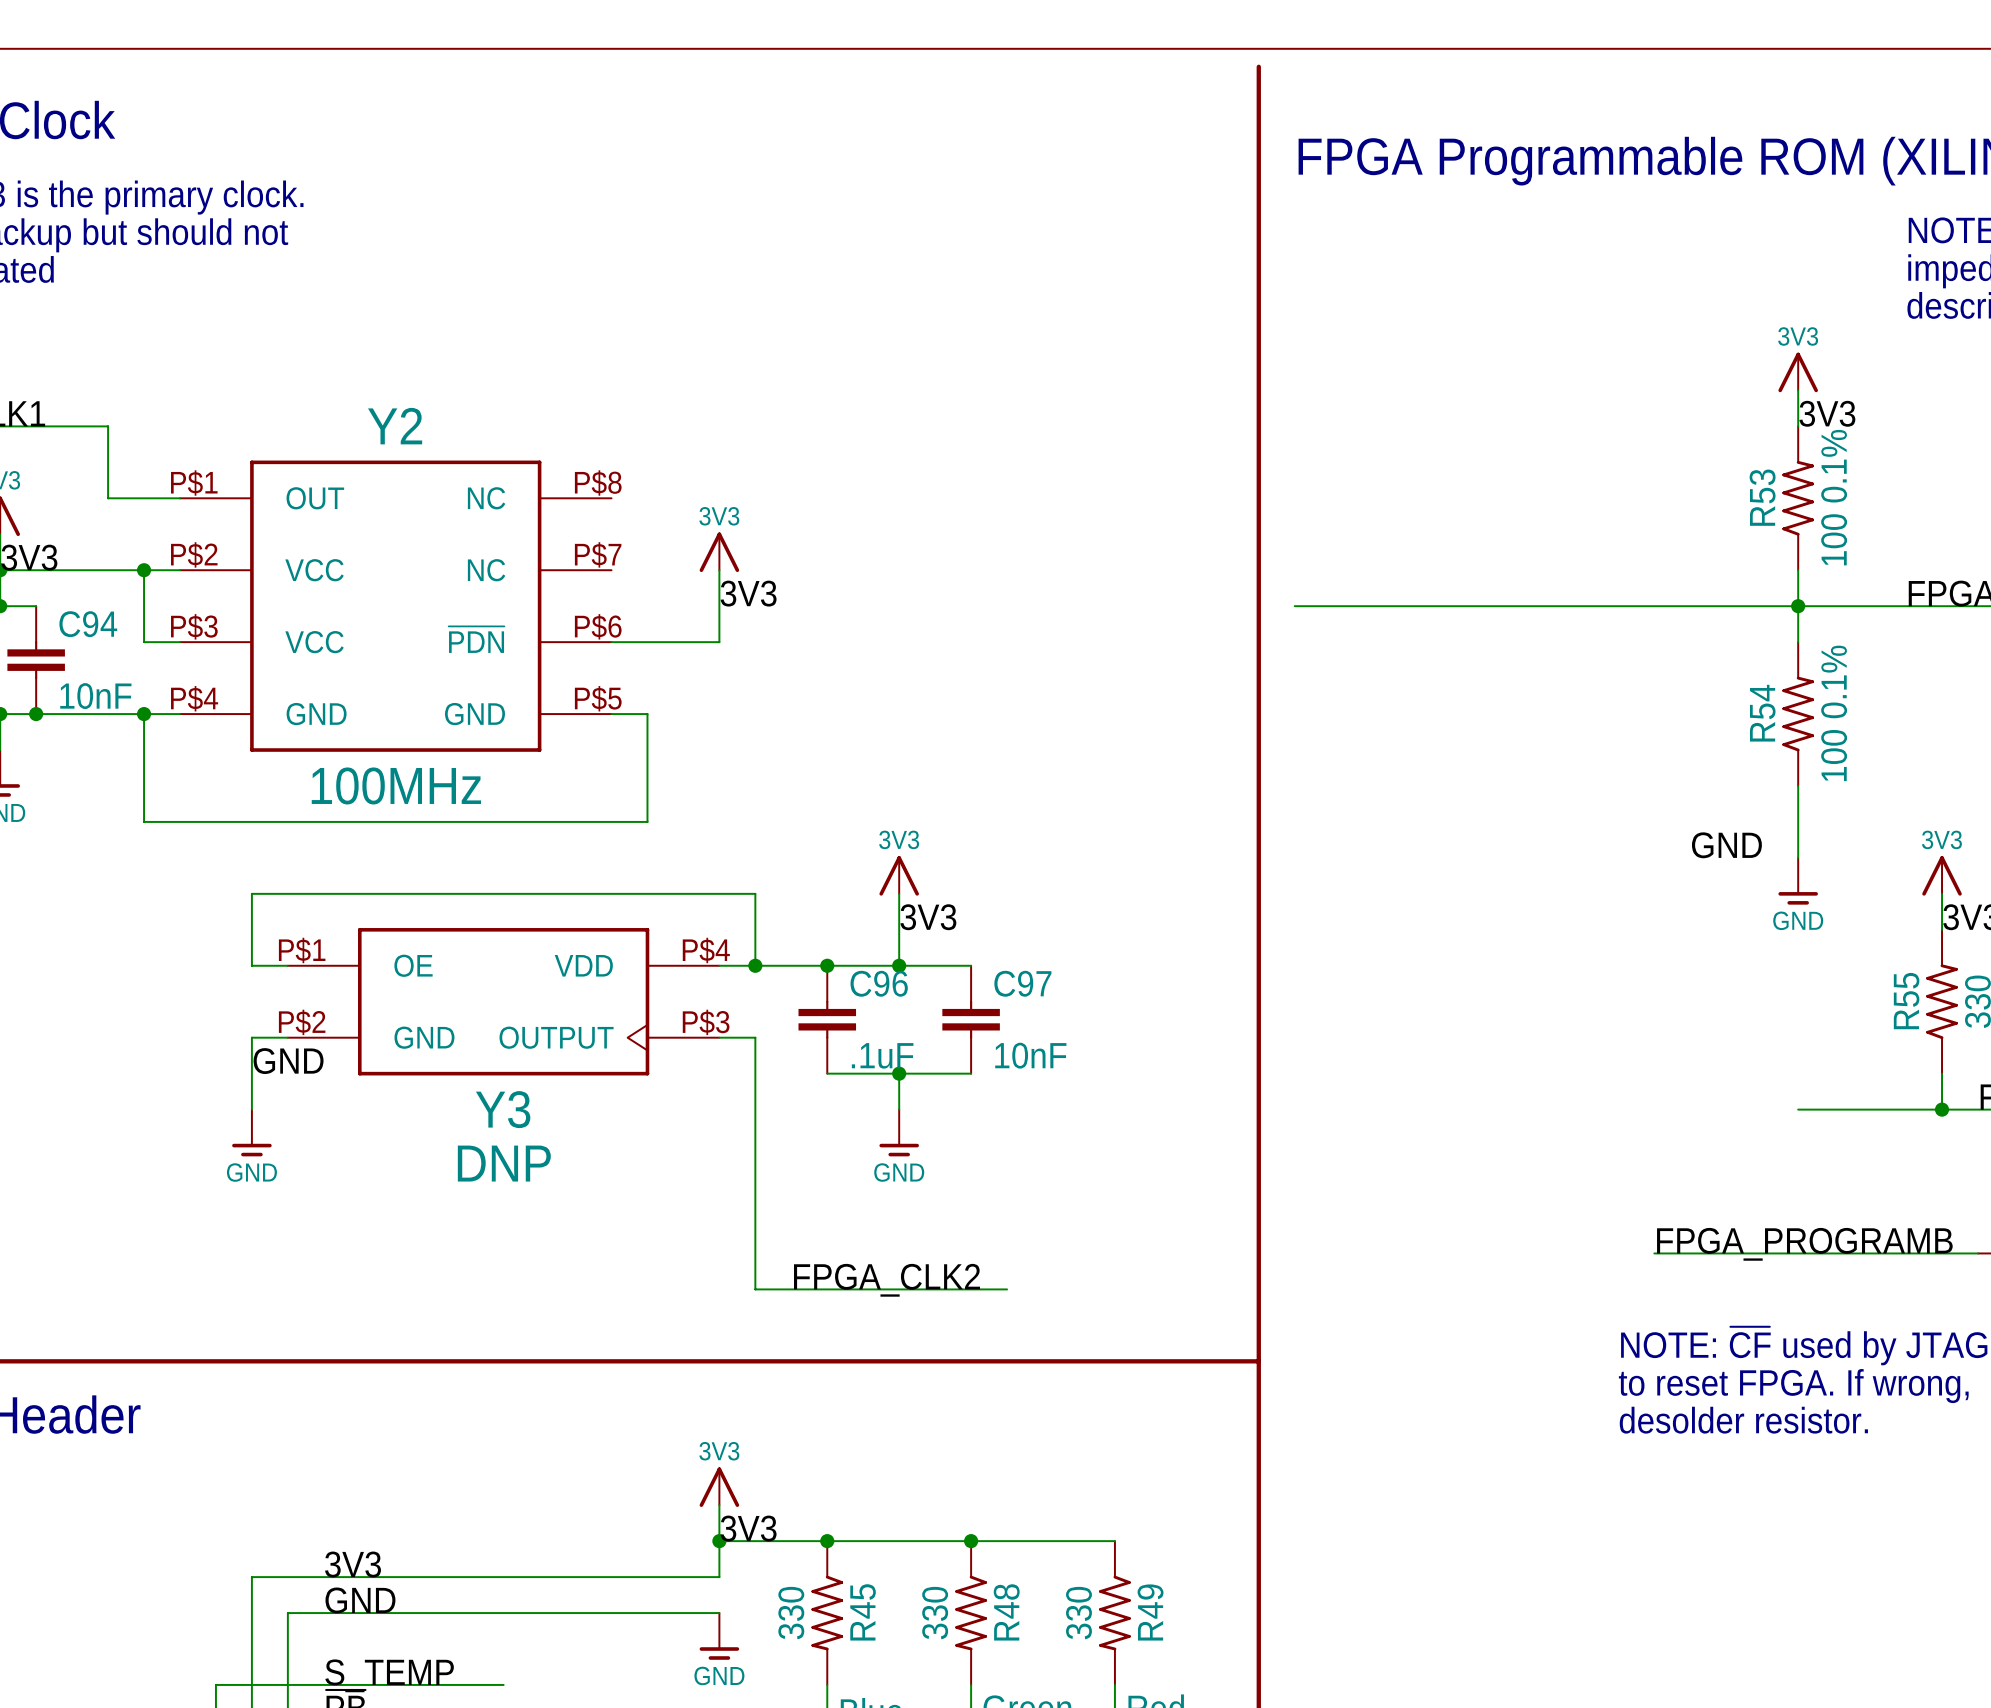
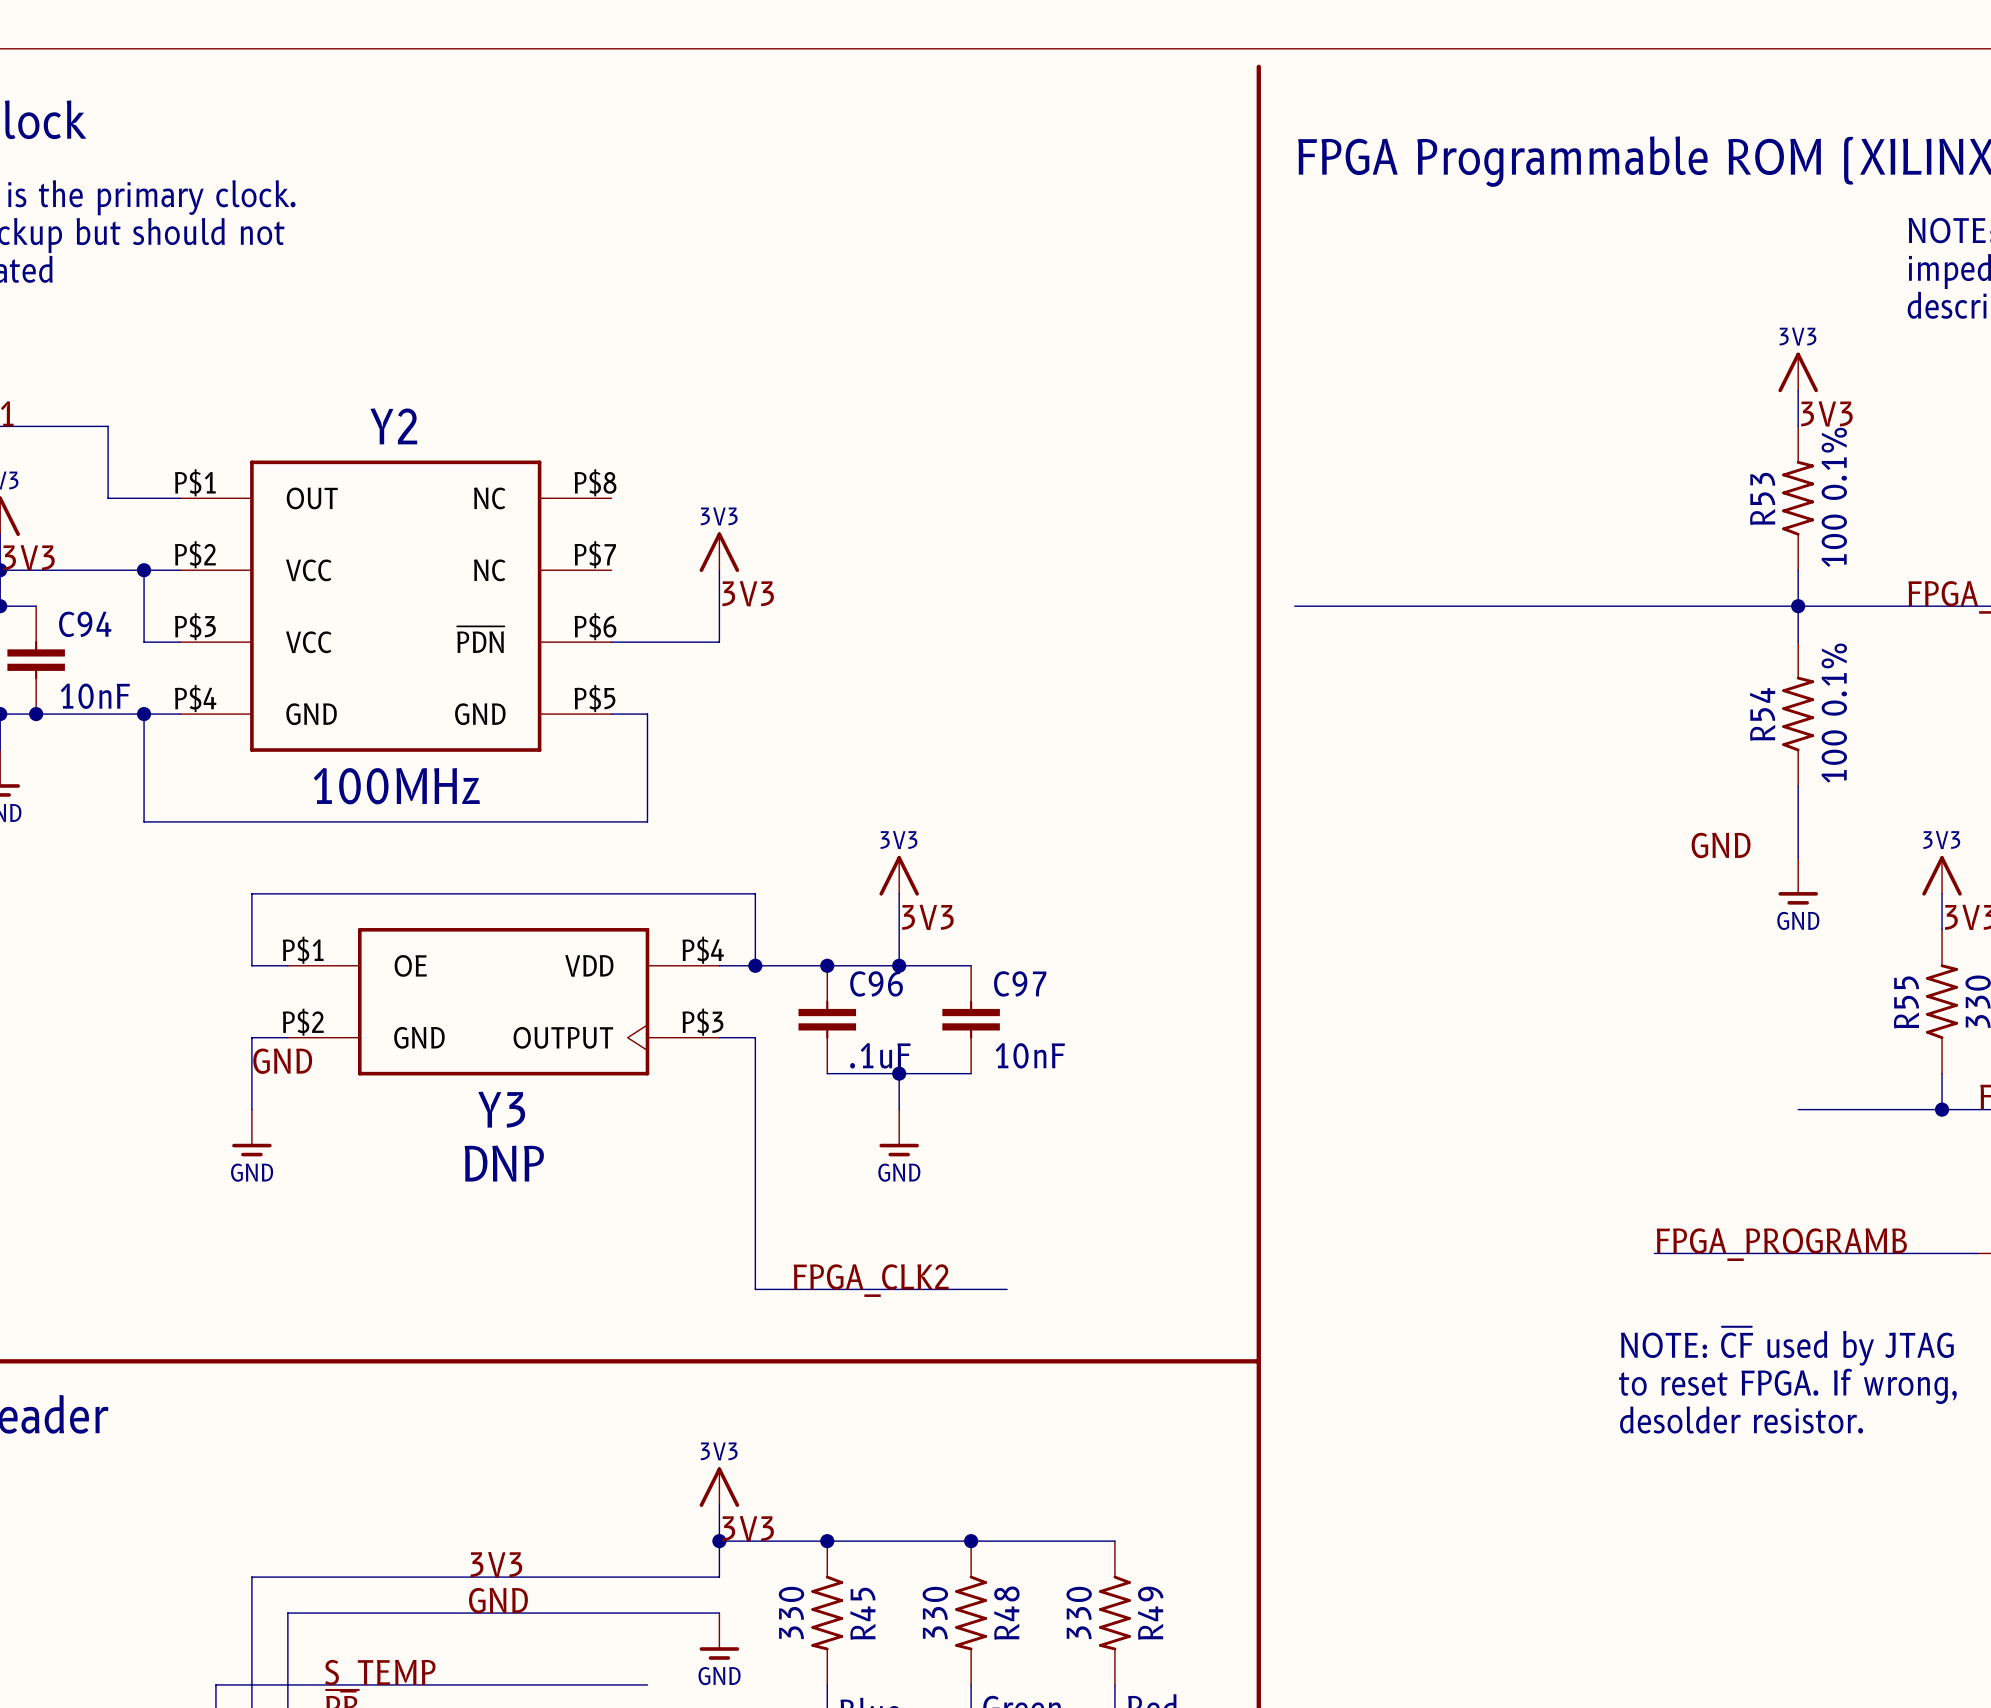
label position: 3V3 (353, 1564) -> 3V3 (496, 1564)
label position: GND (360, 1600) -> GND (498, 1600)
wire: none -> (503, 1684) (647, 1684)

